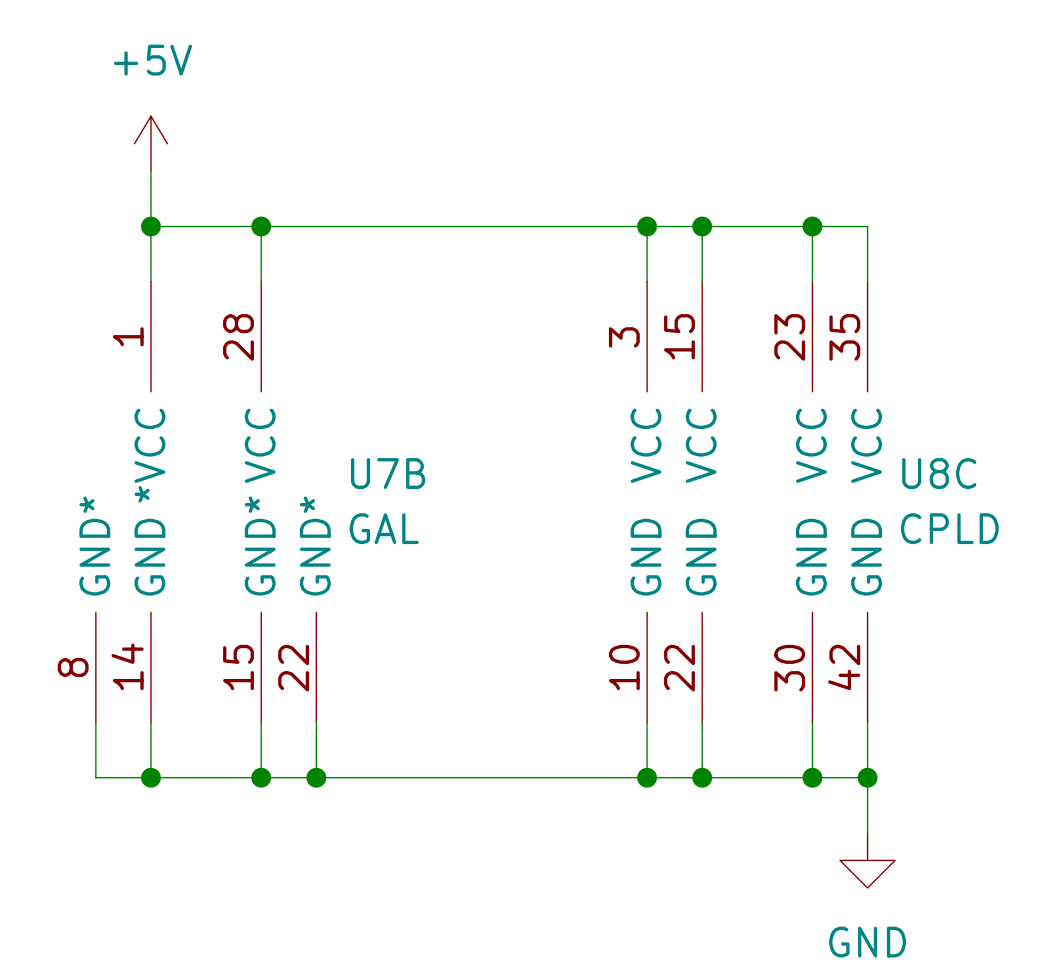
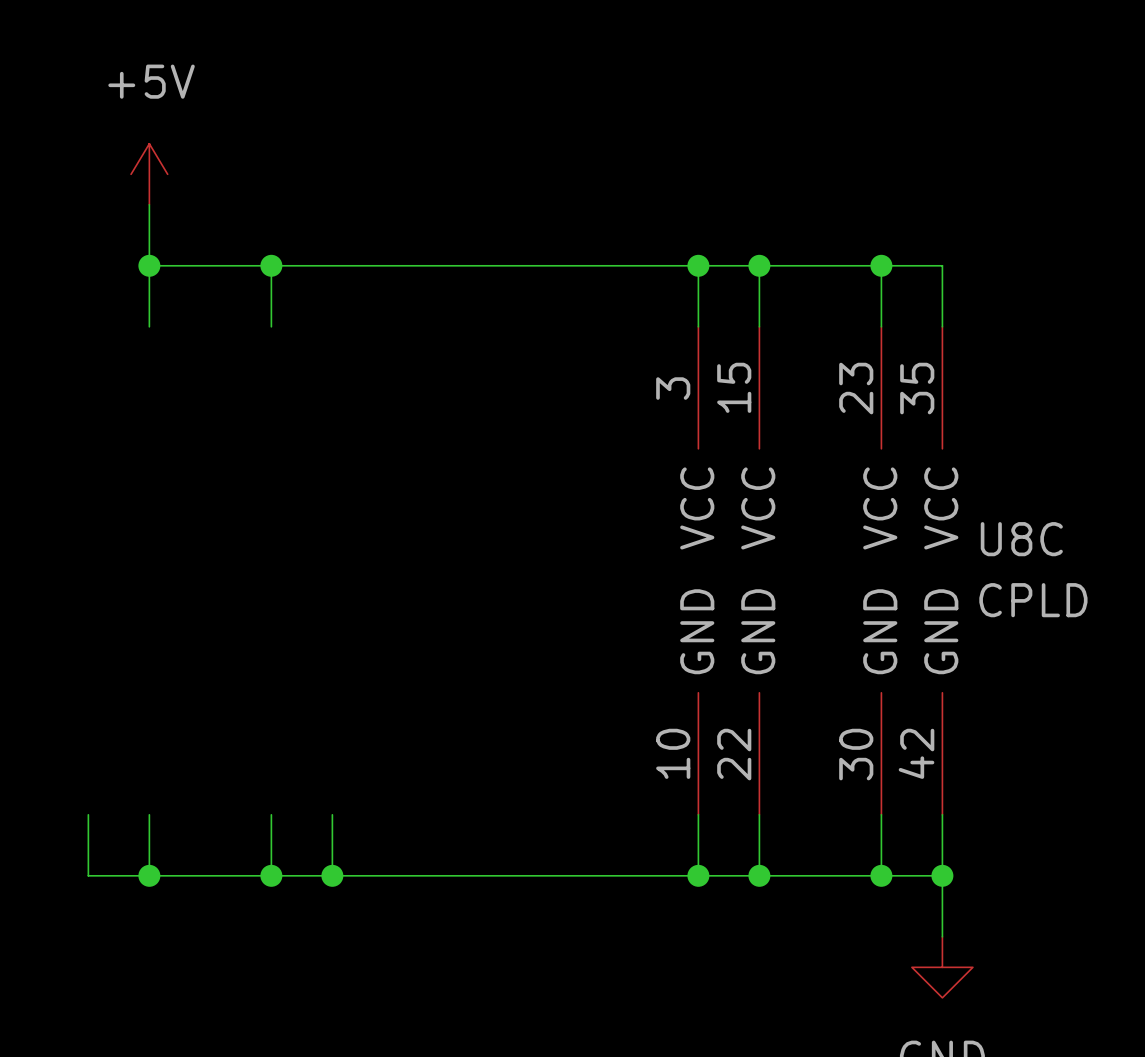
U7B: GAL (206, 502) -> none

